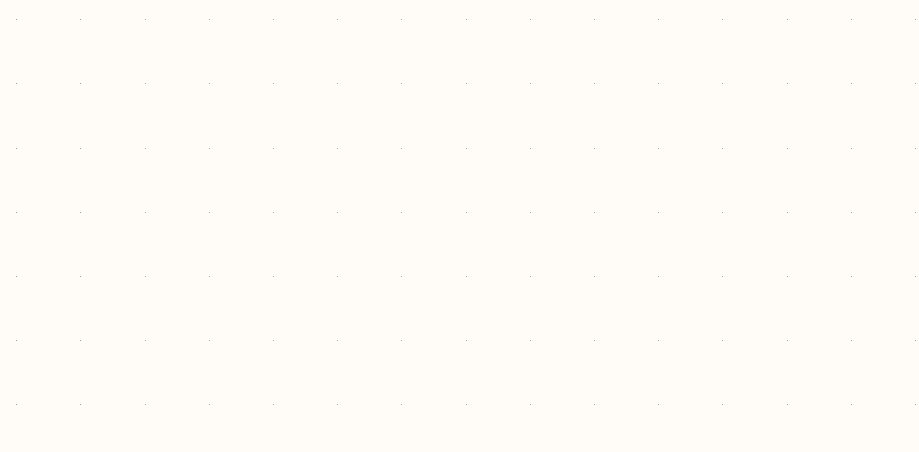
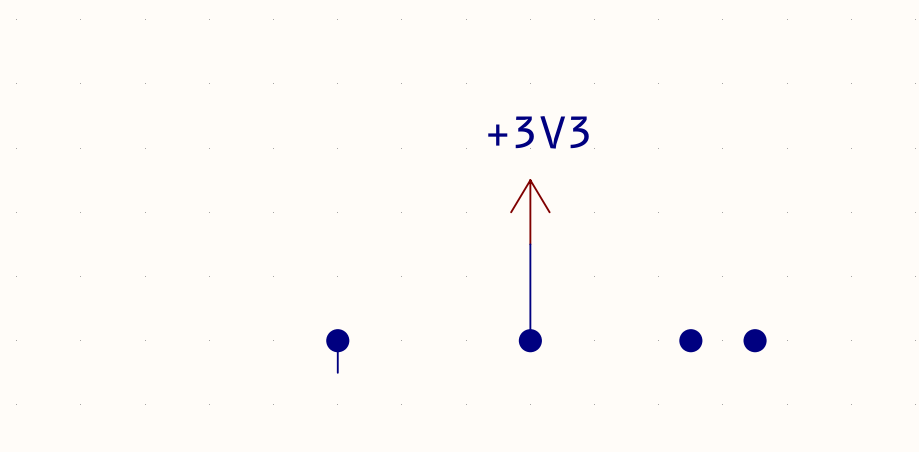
power symbol: none -> +3V3 (530, 212)
wire: none -> (530, 244) (530, 340)
wire: none -> (337, 340) (337, 372)
junction: none -> (337, 340)
junction: none -> (530, 340)
junction: none -> (690, 340)
junction: none -> (755, 340)

